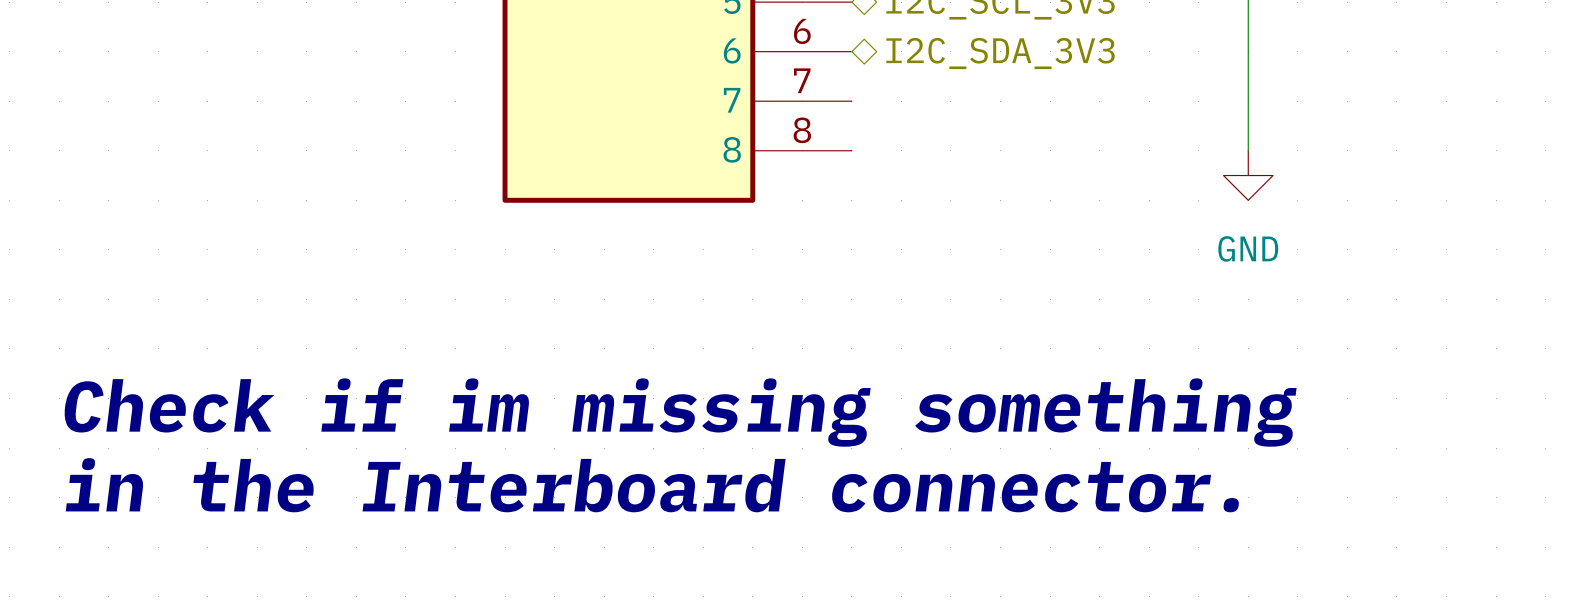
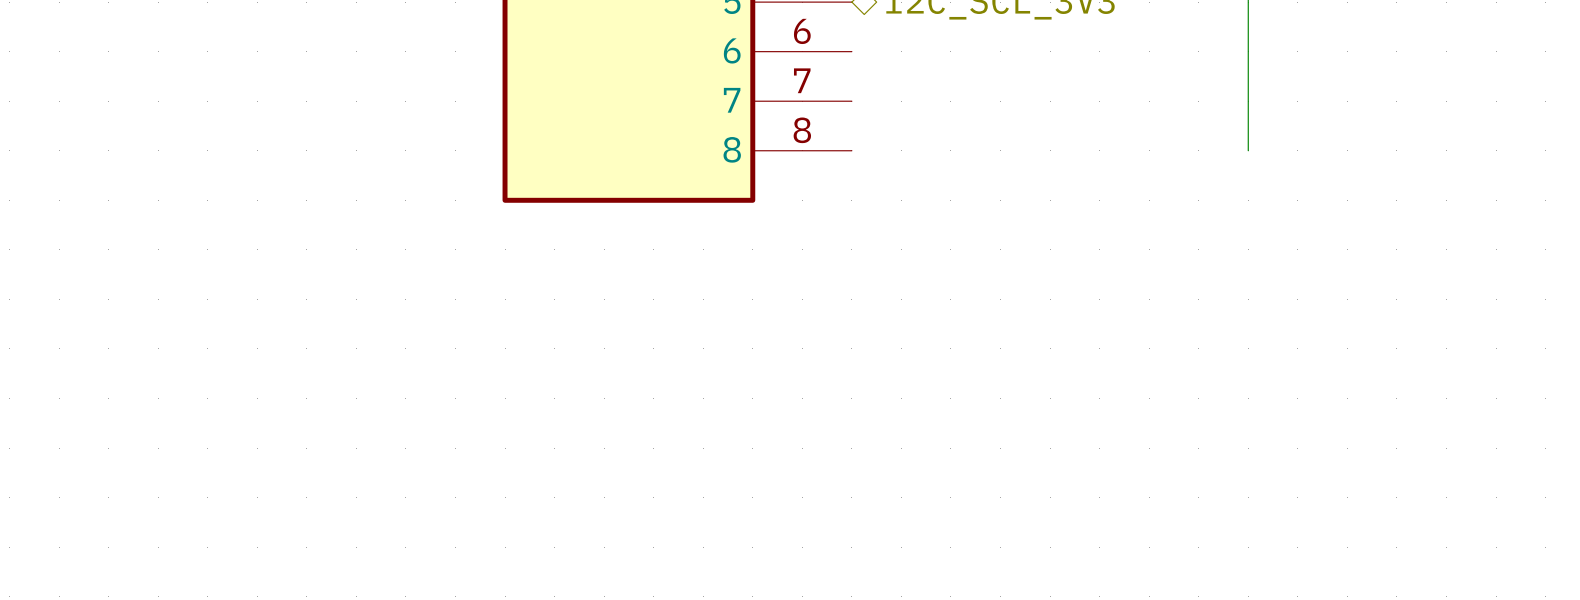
hierarchical label: I2C_SDA_3V3 (1000, 53) -> none
power symbol: GND (1248, 175) -> none
text: Check if im missing something (680, 412) -> none
text: in the Interboard connector. (652, 485) -> none

